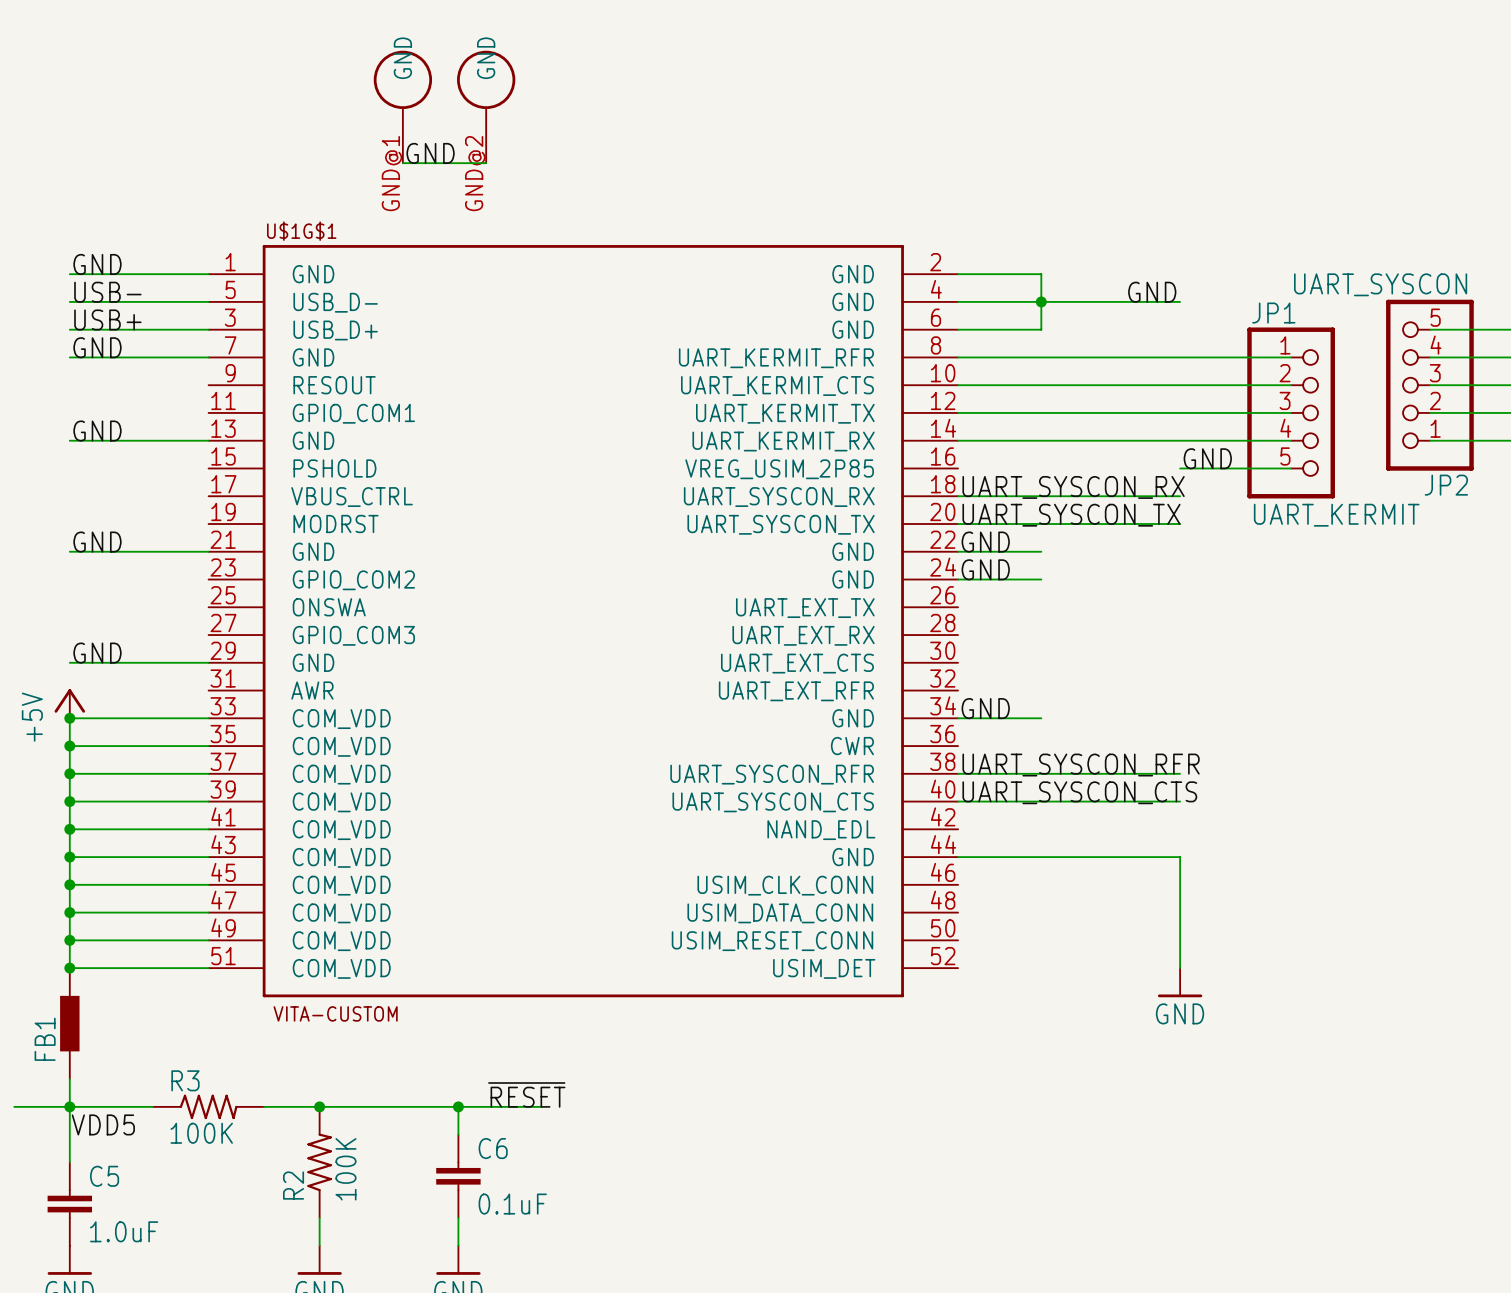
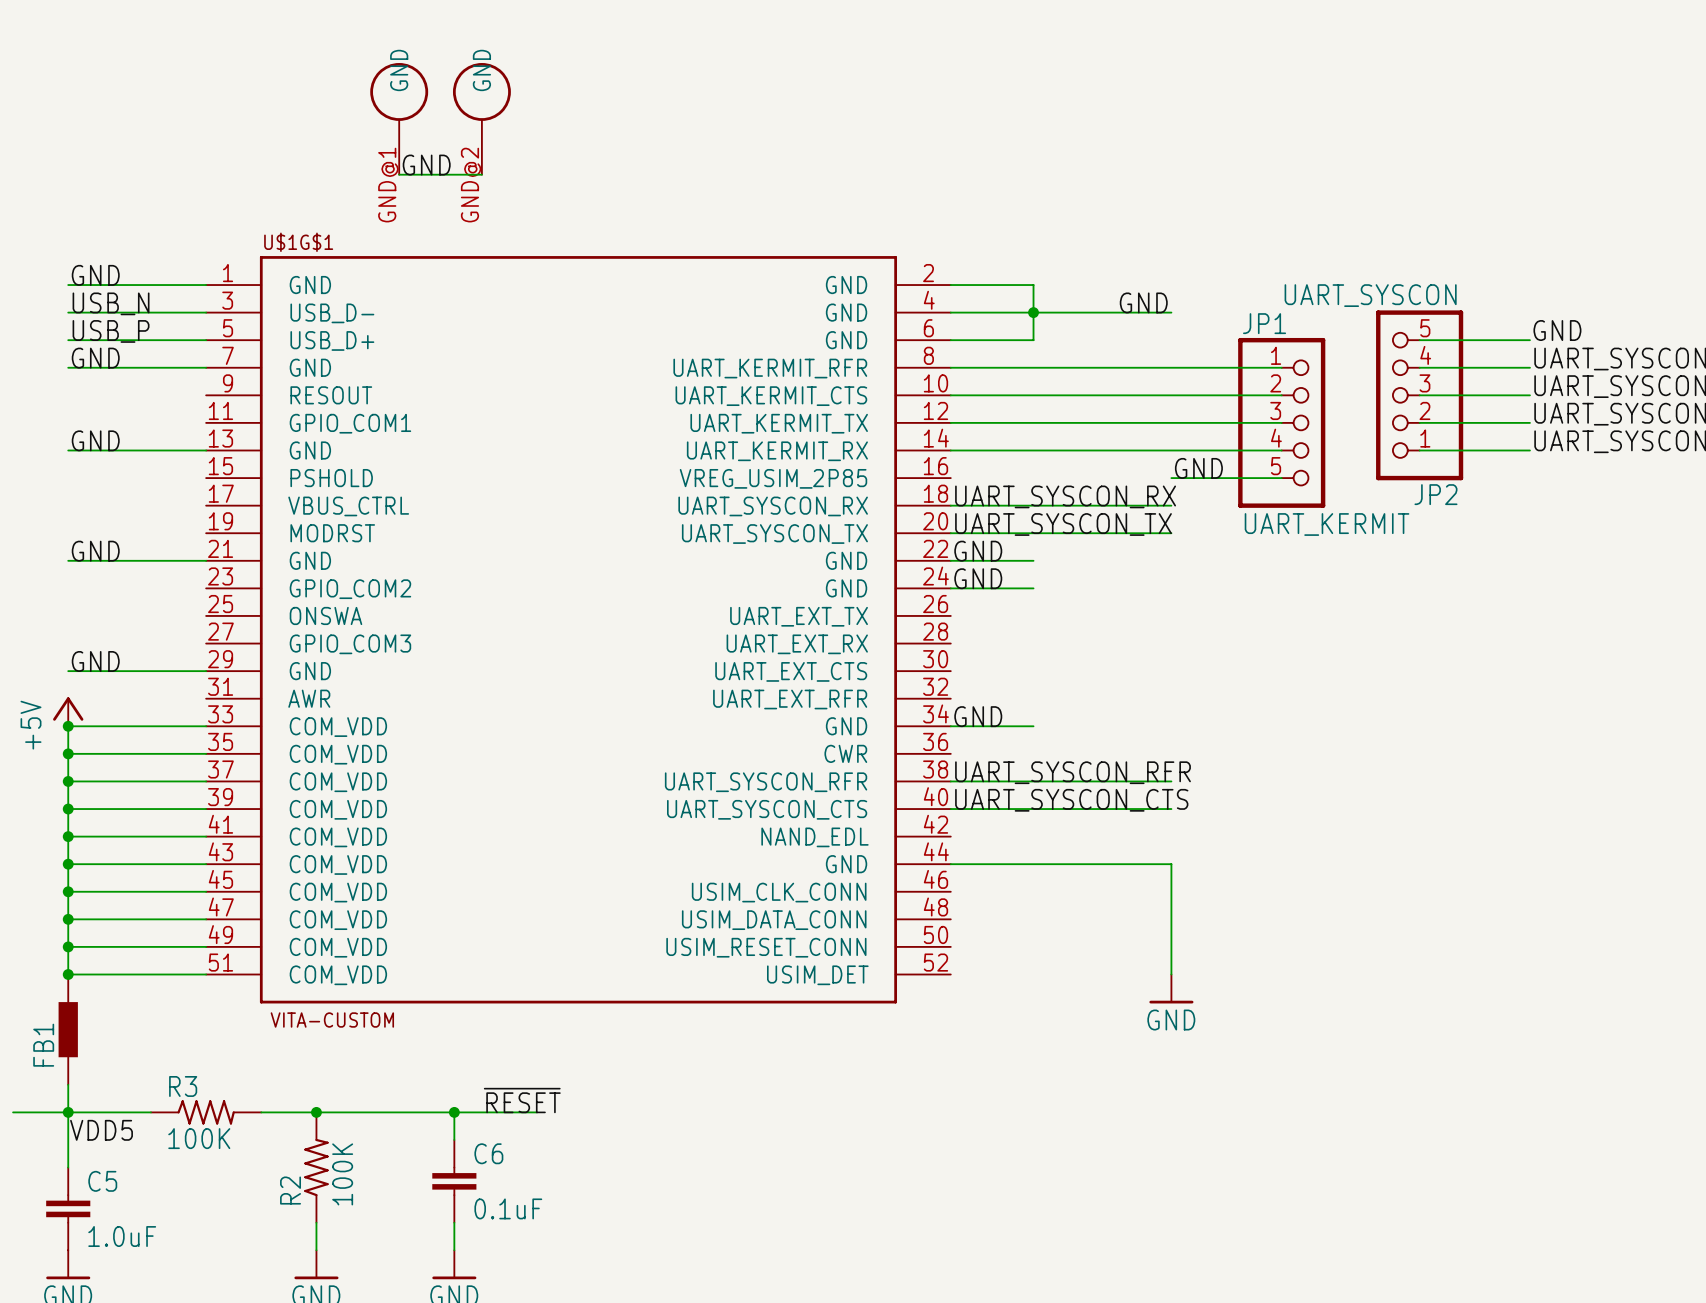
U$1G$1 pin number: 5 (230, 289) -> 3 (227, 300)
label: USB- (107, 292) -> USB_N (111, 303)
U$1G$1 pin number: 3 (230, 317) -> 5 (228, 328)
label: USB+ (107, 319) -> USB_P (111, 331)

